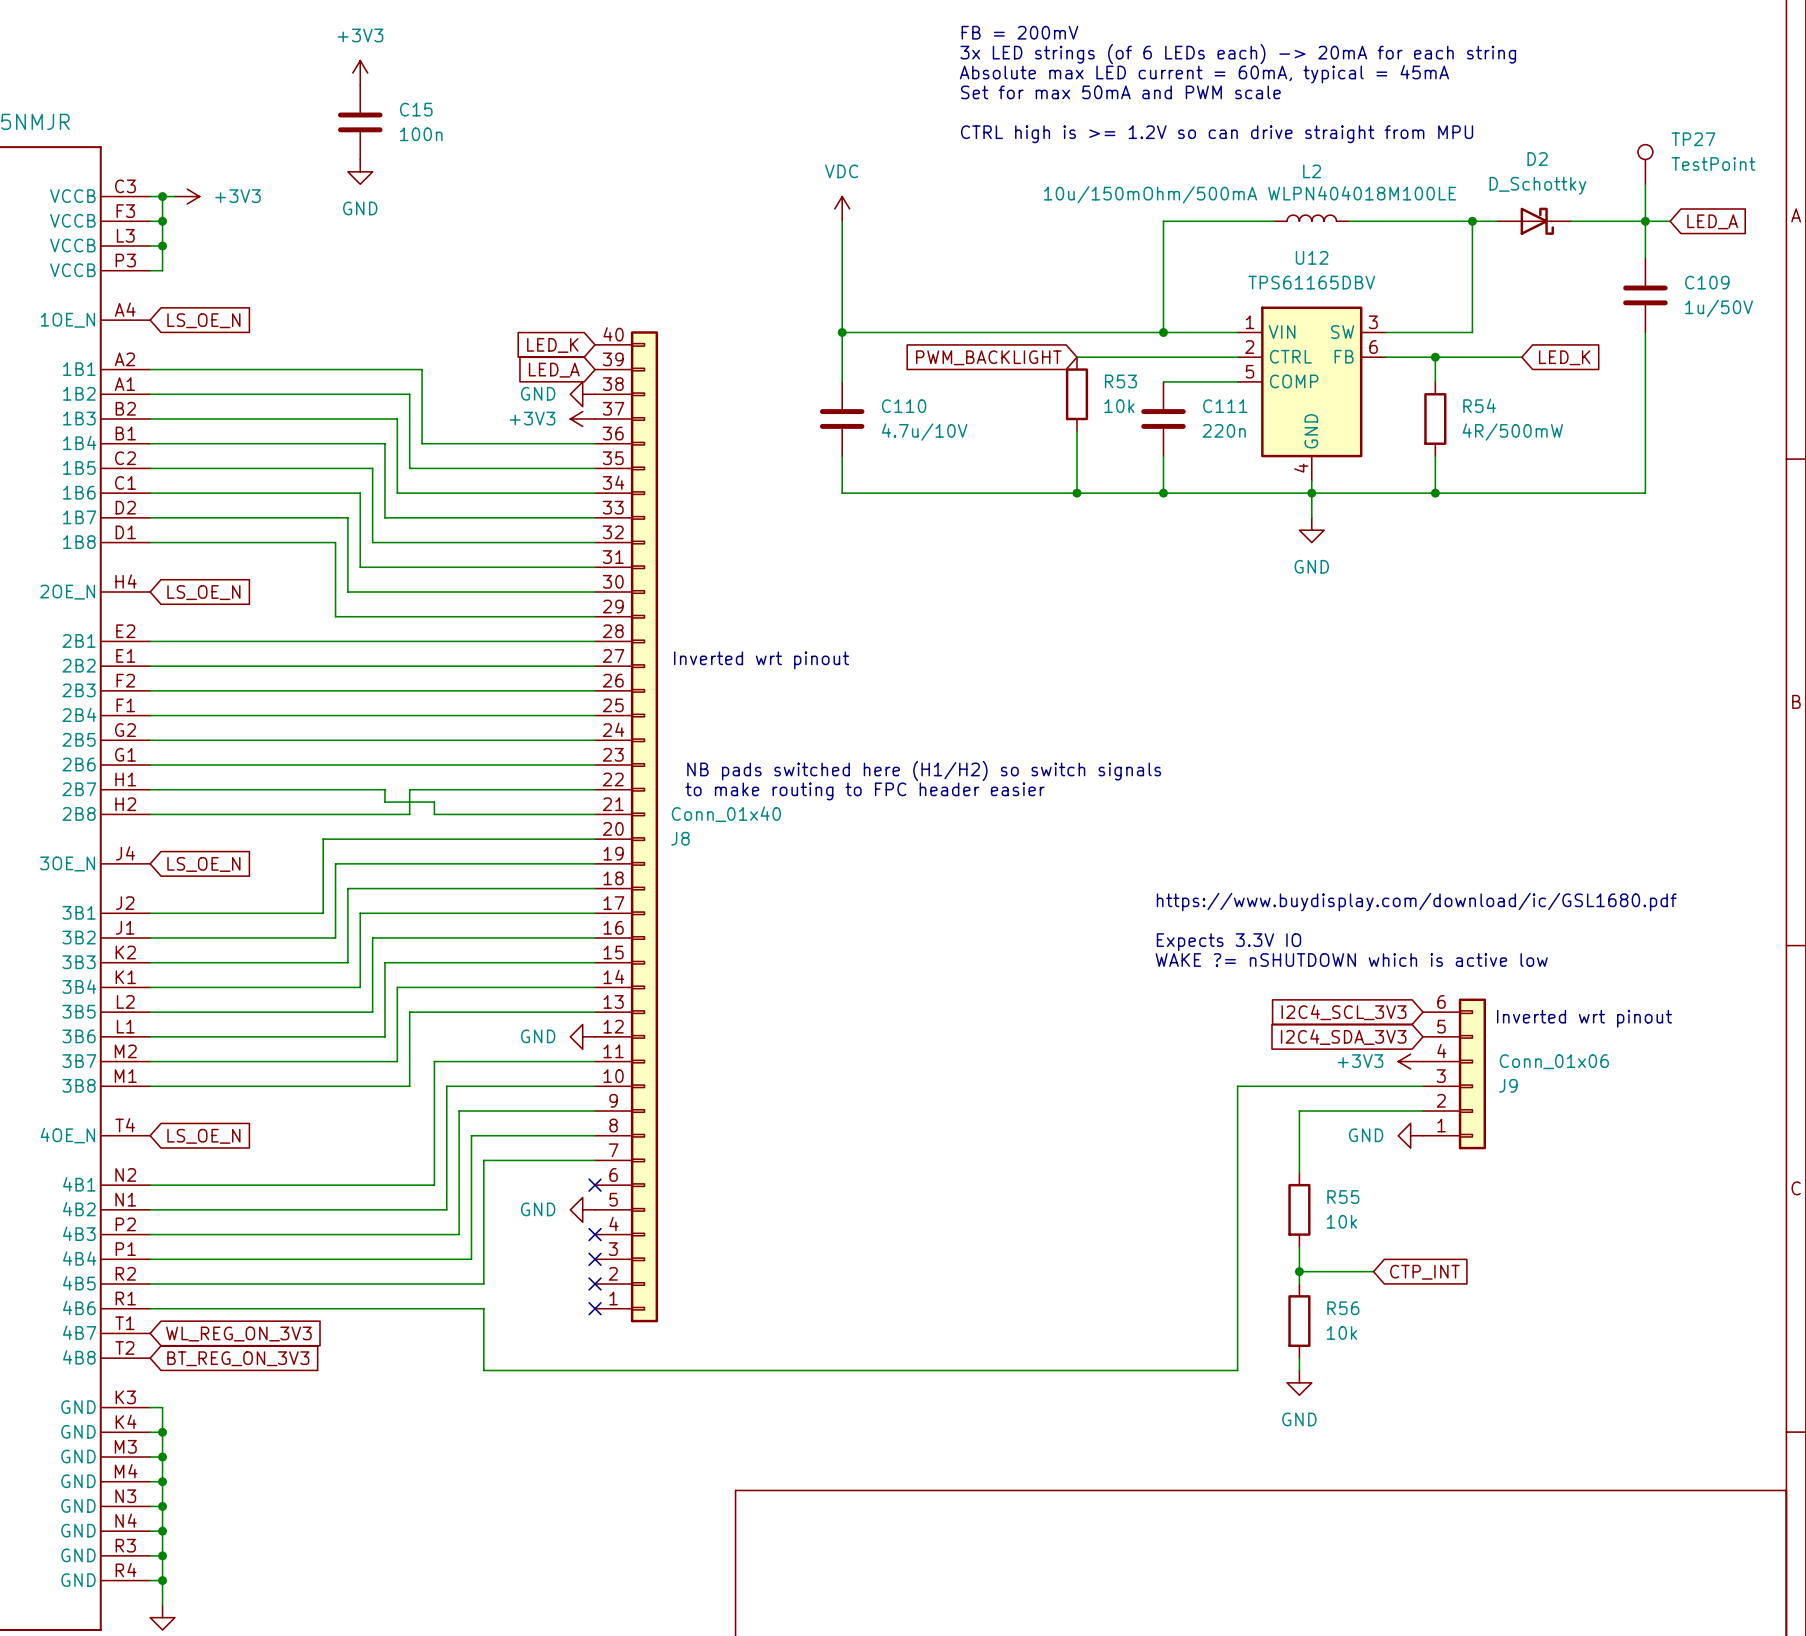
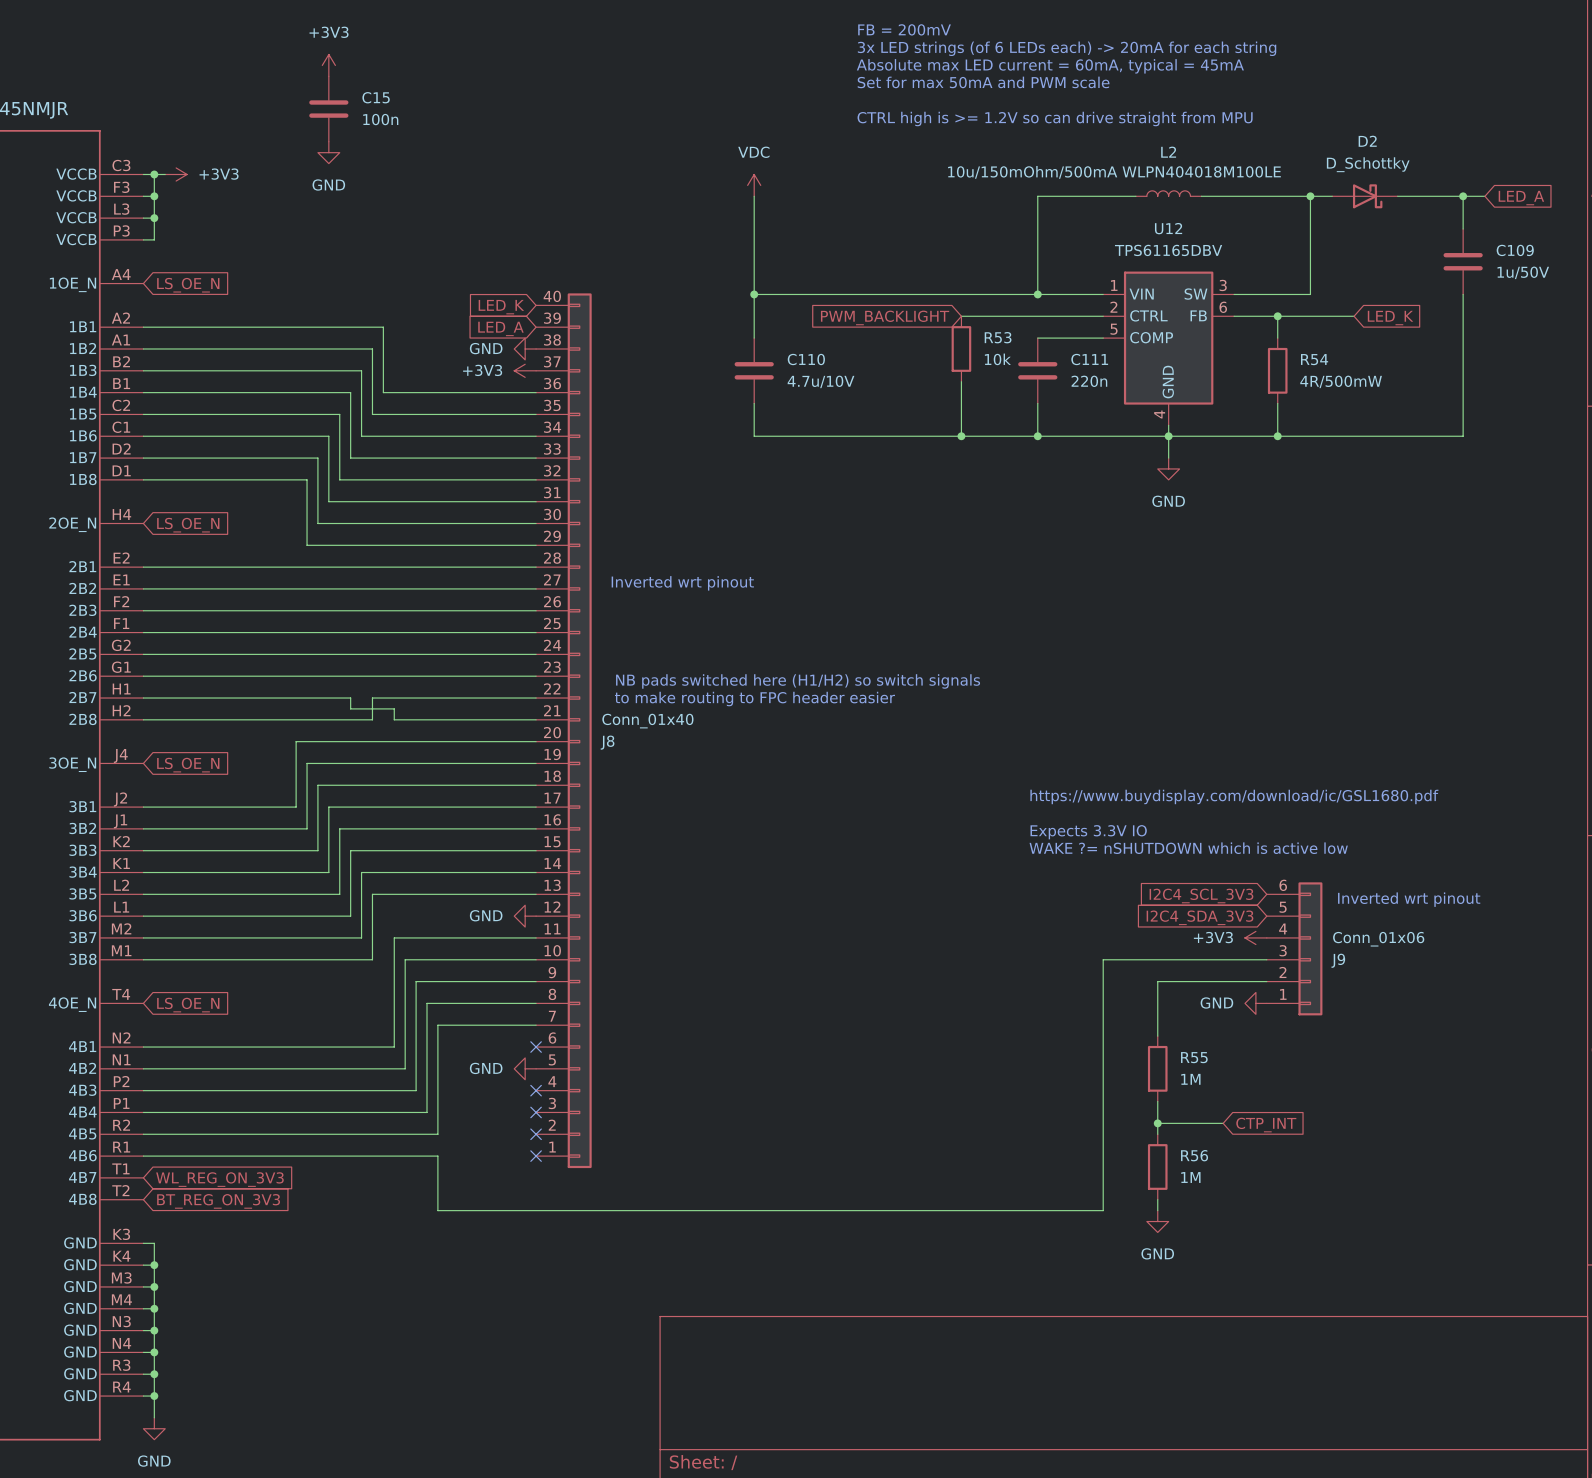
TP27: TestPoint (1645, 164) -> none
wire: (1645, 184) (1645, 221) -> none
R55 value: 10k (1341, 1221) -> 1M (1190, 1079)
R56 value: 10k (1341, 1332) -> 1M (1190, 1177)

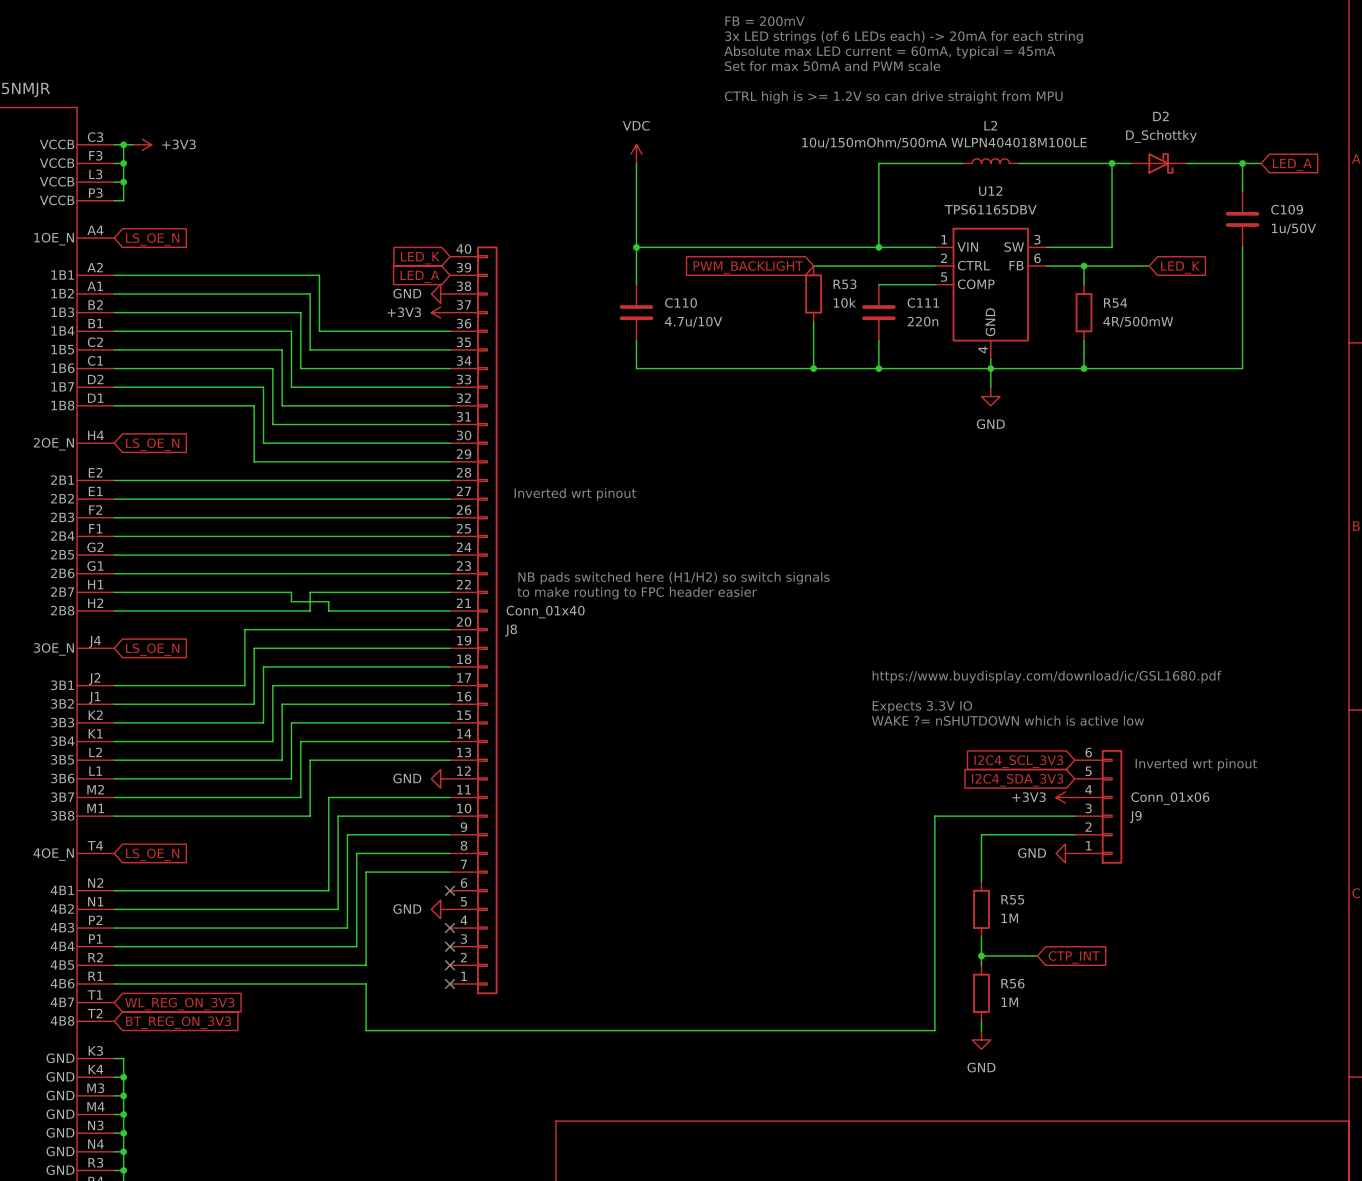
power symbol: +3V3 (328, 65) -> none
C15: 100n (328, 109) -> none
power symbol: GND (328, 152) -> none

